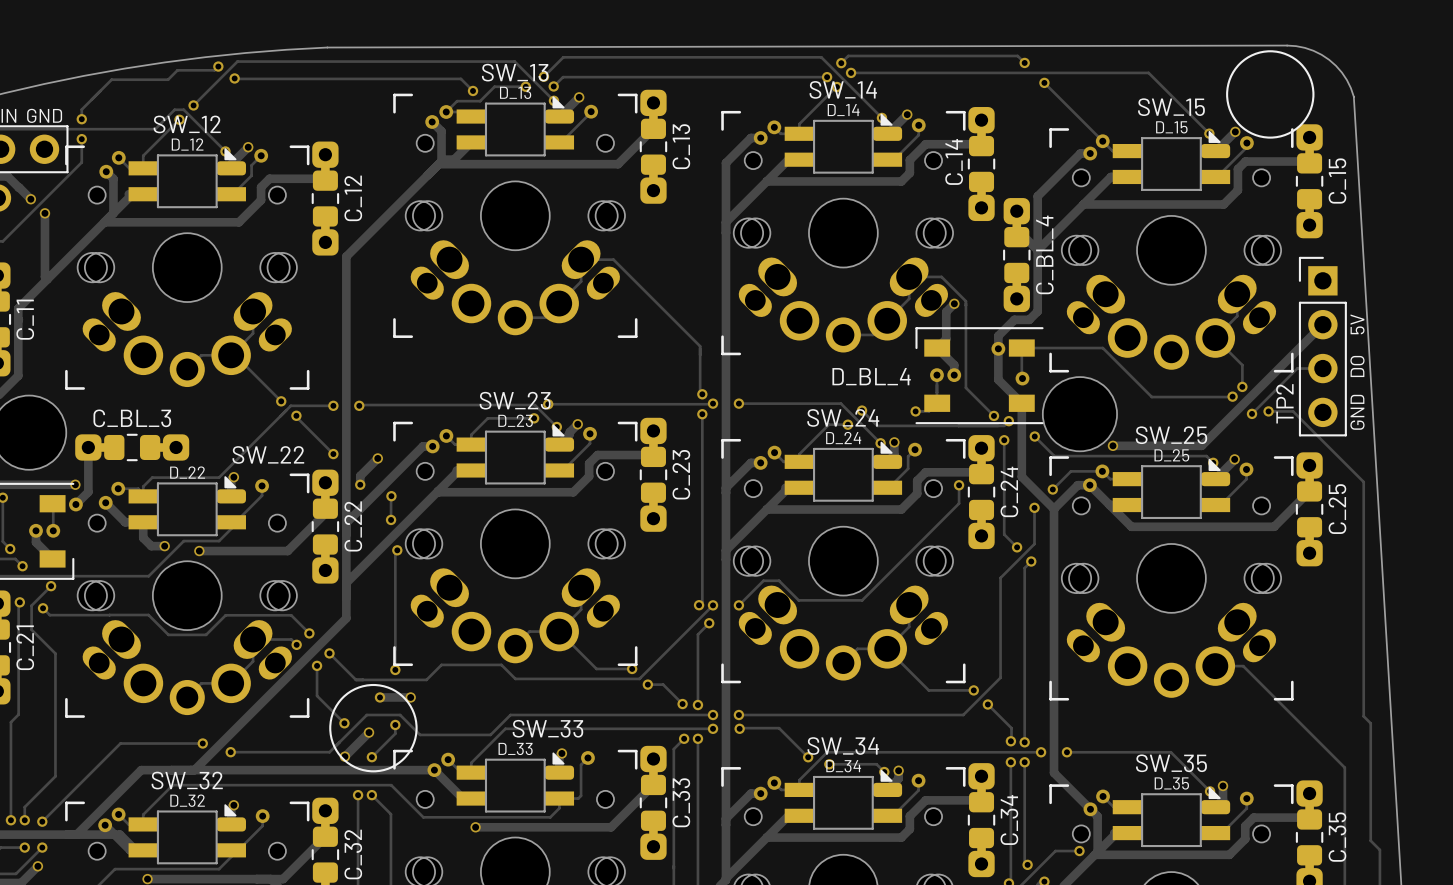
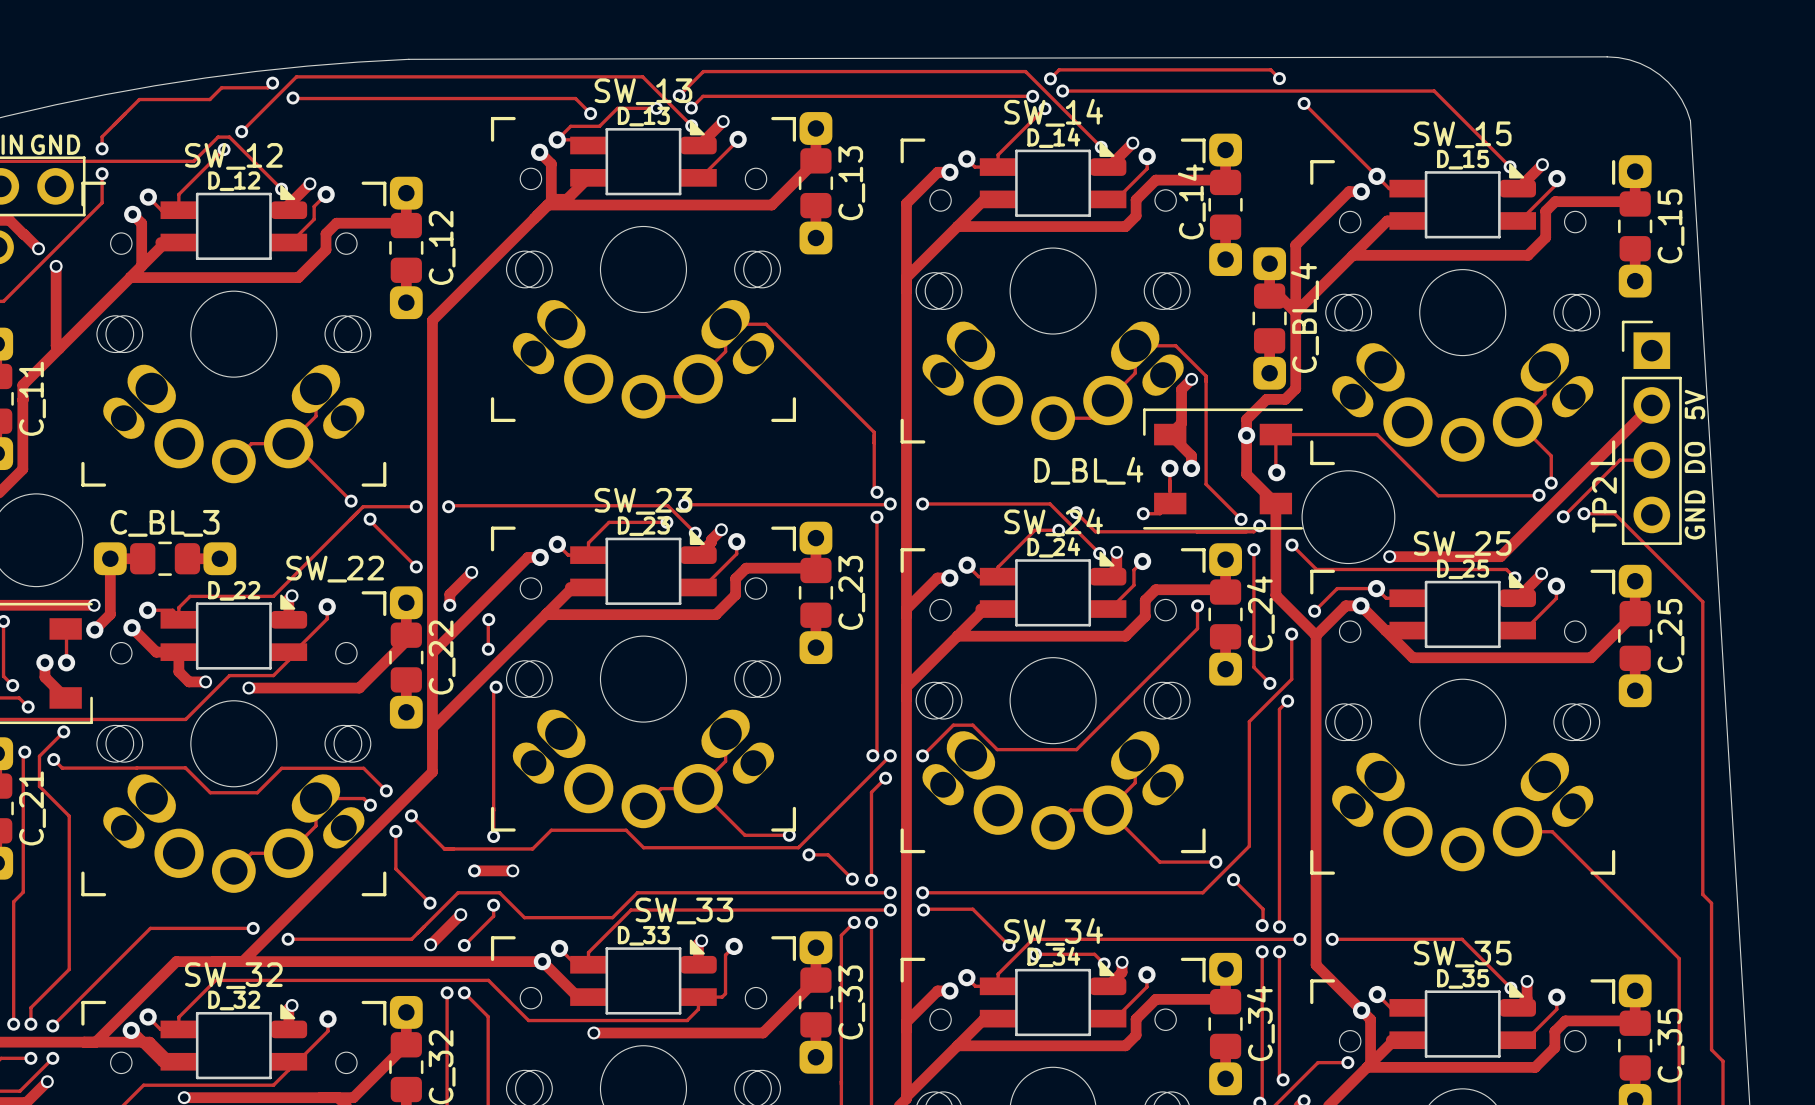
drawing: [1226, 50, 1315, 139] -> none
drawing: [329, 683, 418, 773] -> none

